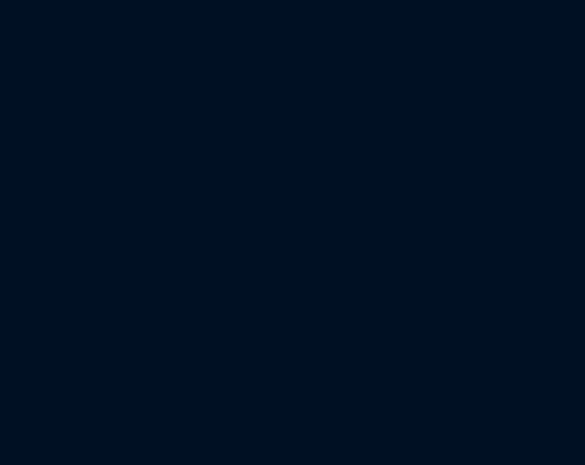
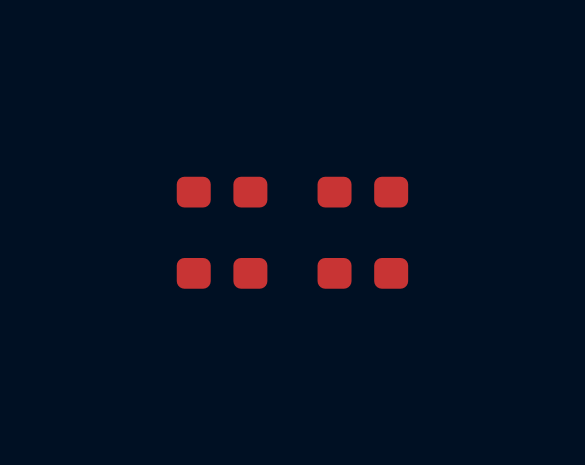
part: none -> (222, 192)
part: none -> (362, 192)
part: none -> (222, 273)
part: none -> (362, 273)

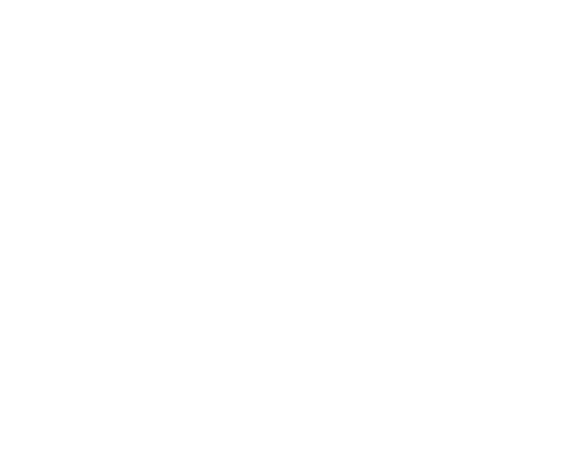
part: (222, 192) -> none
part: (362, 192) -> none
part: (222, 273) -> none
part: (362, 273) -> none

